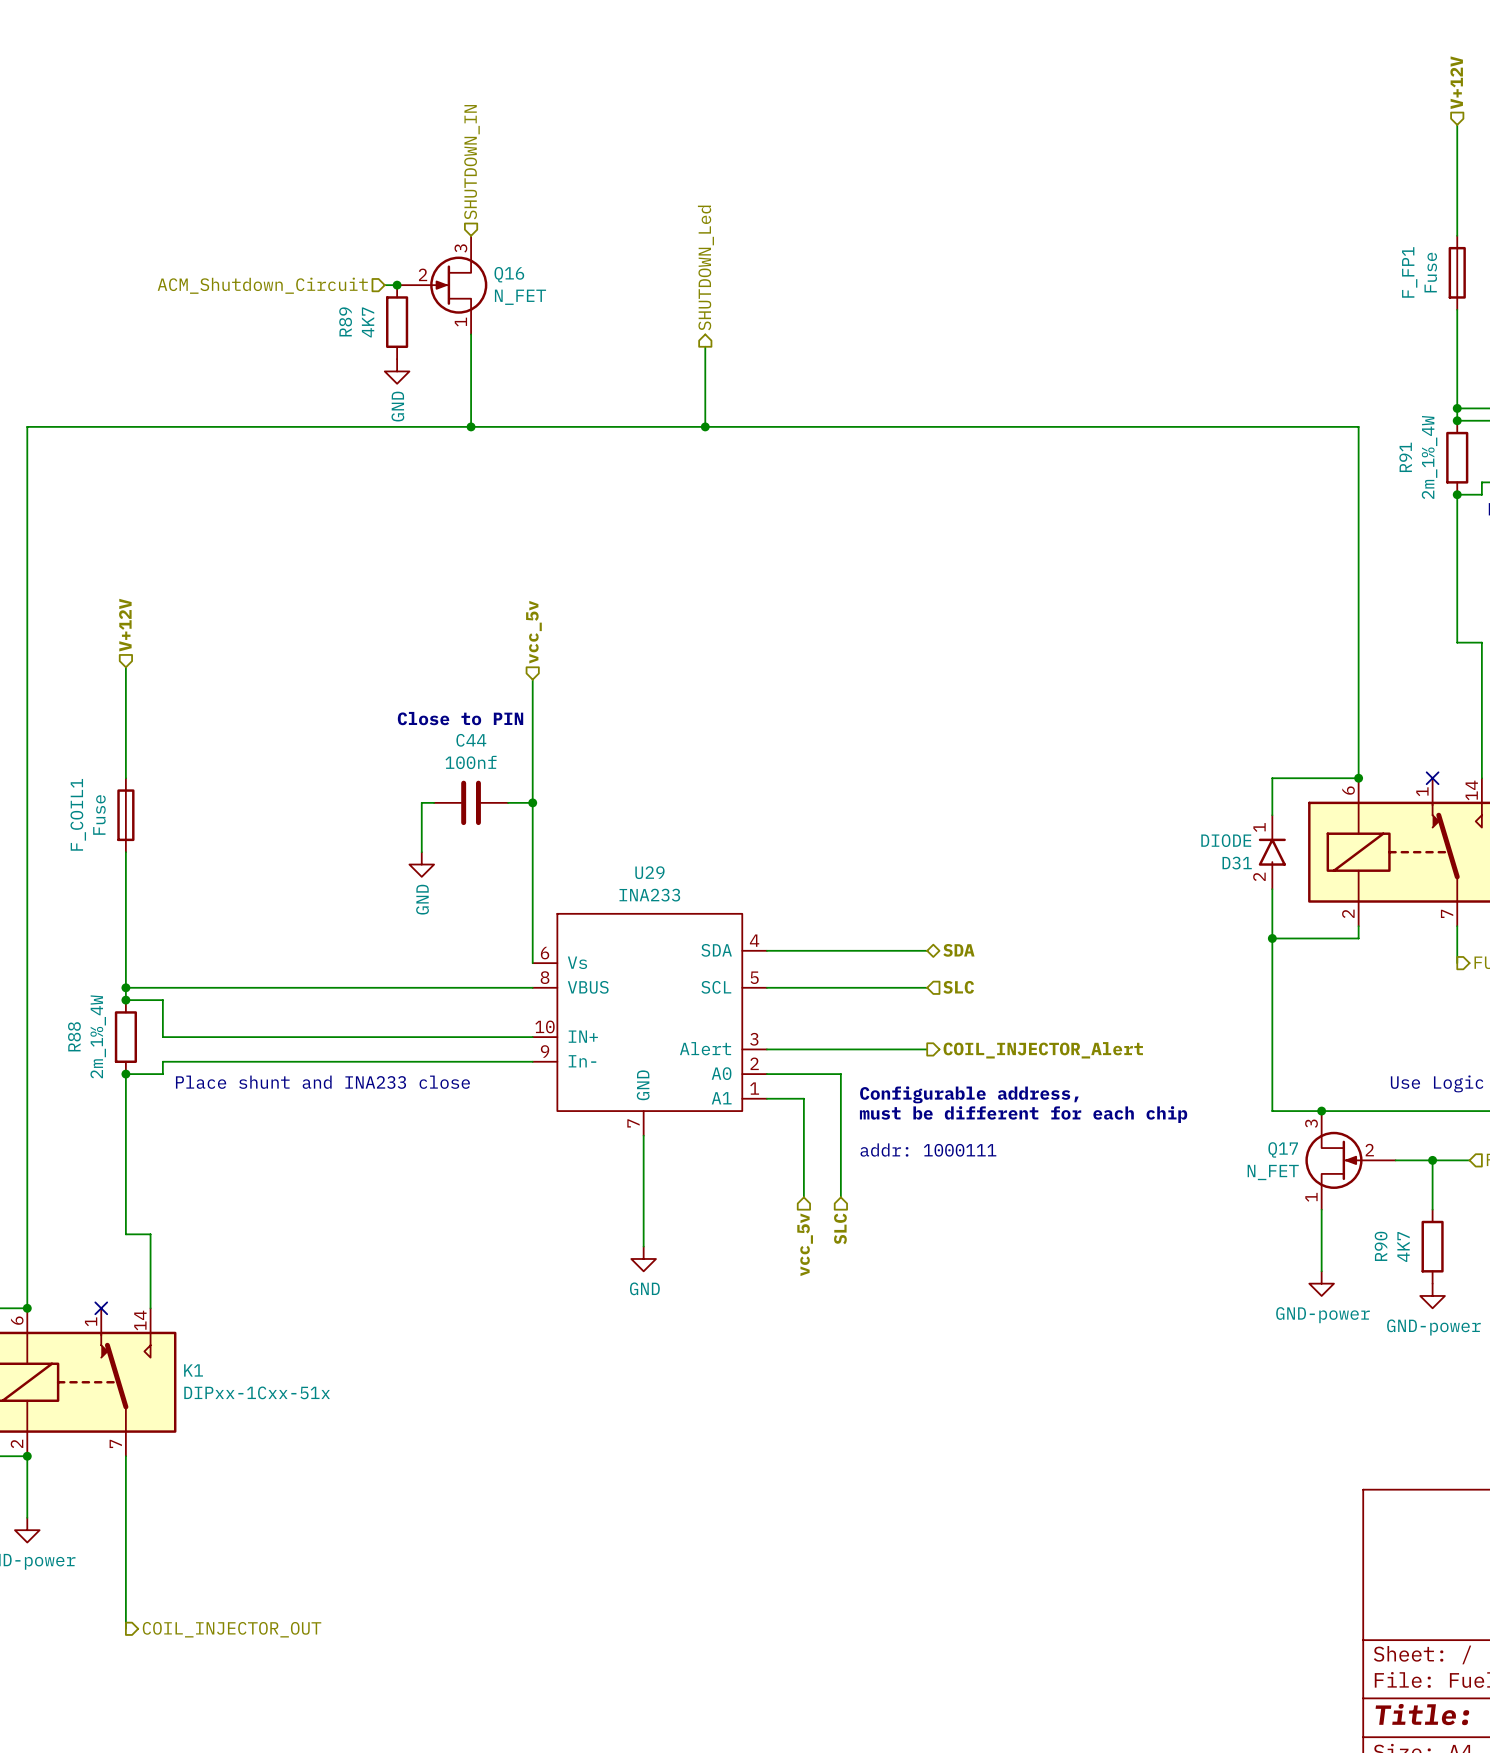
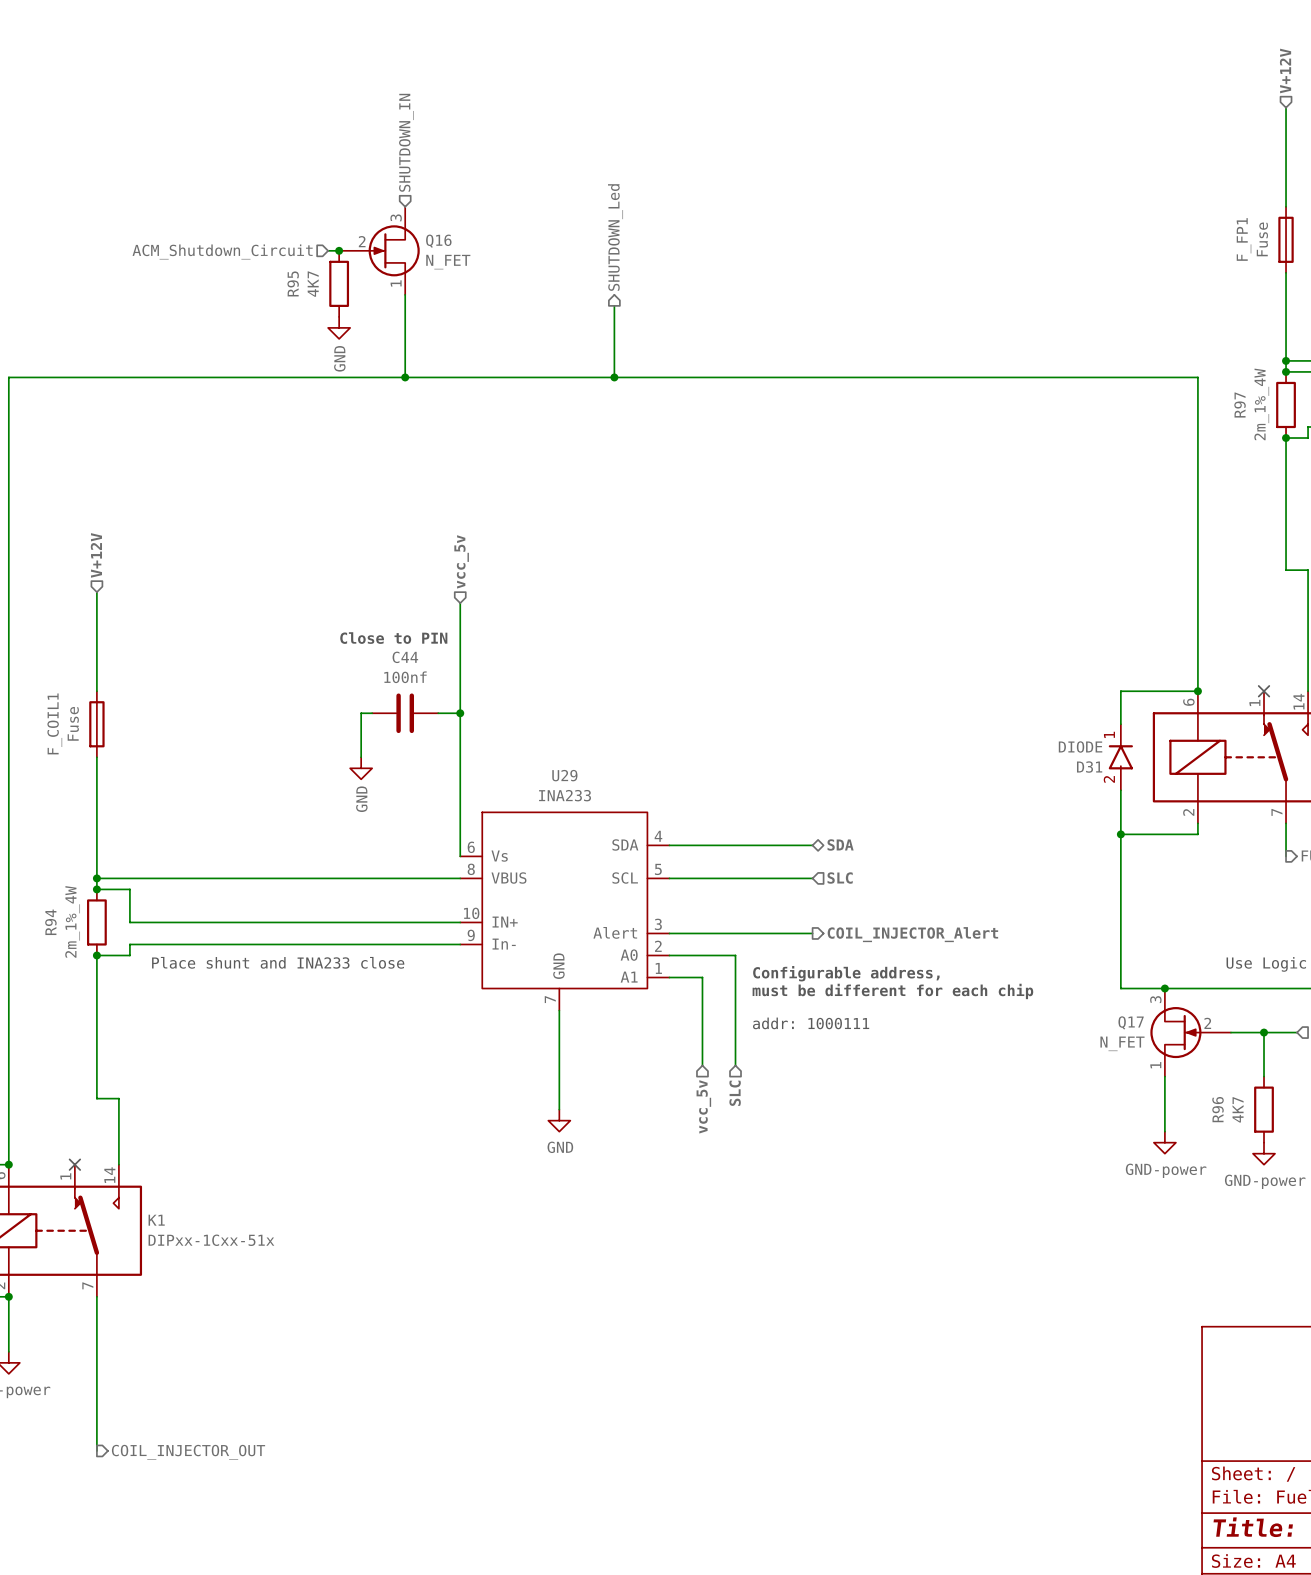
R89 name: R89 (345, 321) -> R95 (293, 283)
R91 name: R91 (1405, 457) -> R97 (1240, 405)
R88 name: R88 (74, 1036) -> R94 (50, 922)
R90 name: R90 (1381, 1246) -> R96 (1218, 1109)

